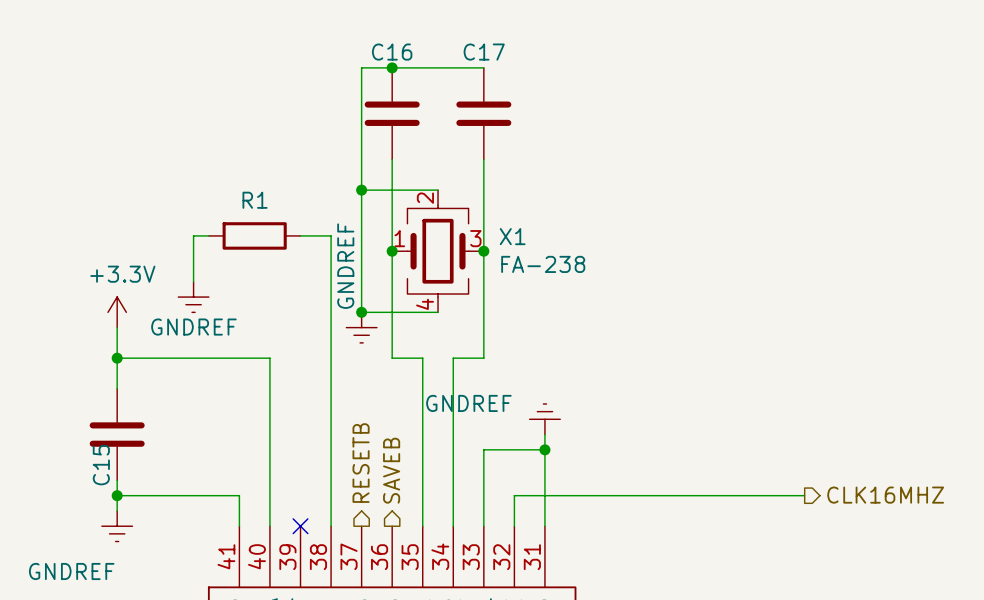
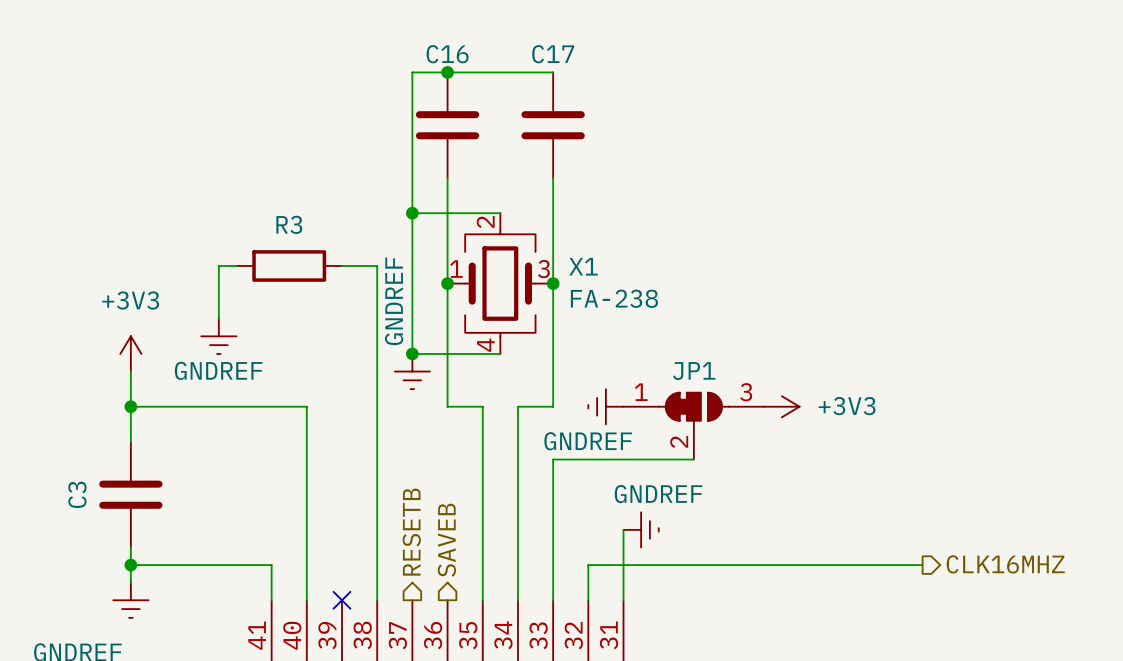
R1 name: R1 (255, 200) -> R3 (289, 224)
power symbol: +3.3V (117, 312) -> +3V3 (130, 353)
power symbol: none -> GNDREF (605, 406)
power symbol: none -> +3V3 (781, 406)
JP1: none -> (693, 426)
power symbol: GNDREF (544, 419) -> none
wire: (544, 434) (544, 465) -> none
wire: (483, 449) (544, 449) -> (553, 512) (553, 459) (693, 459)
junction: (544, 449) -> none
C15 name: C15 (101, 465) -> C3 (77, 494)
power symbol: none -> GNDREF (641, 529)

